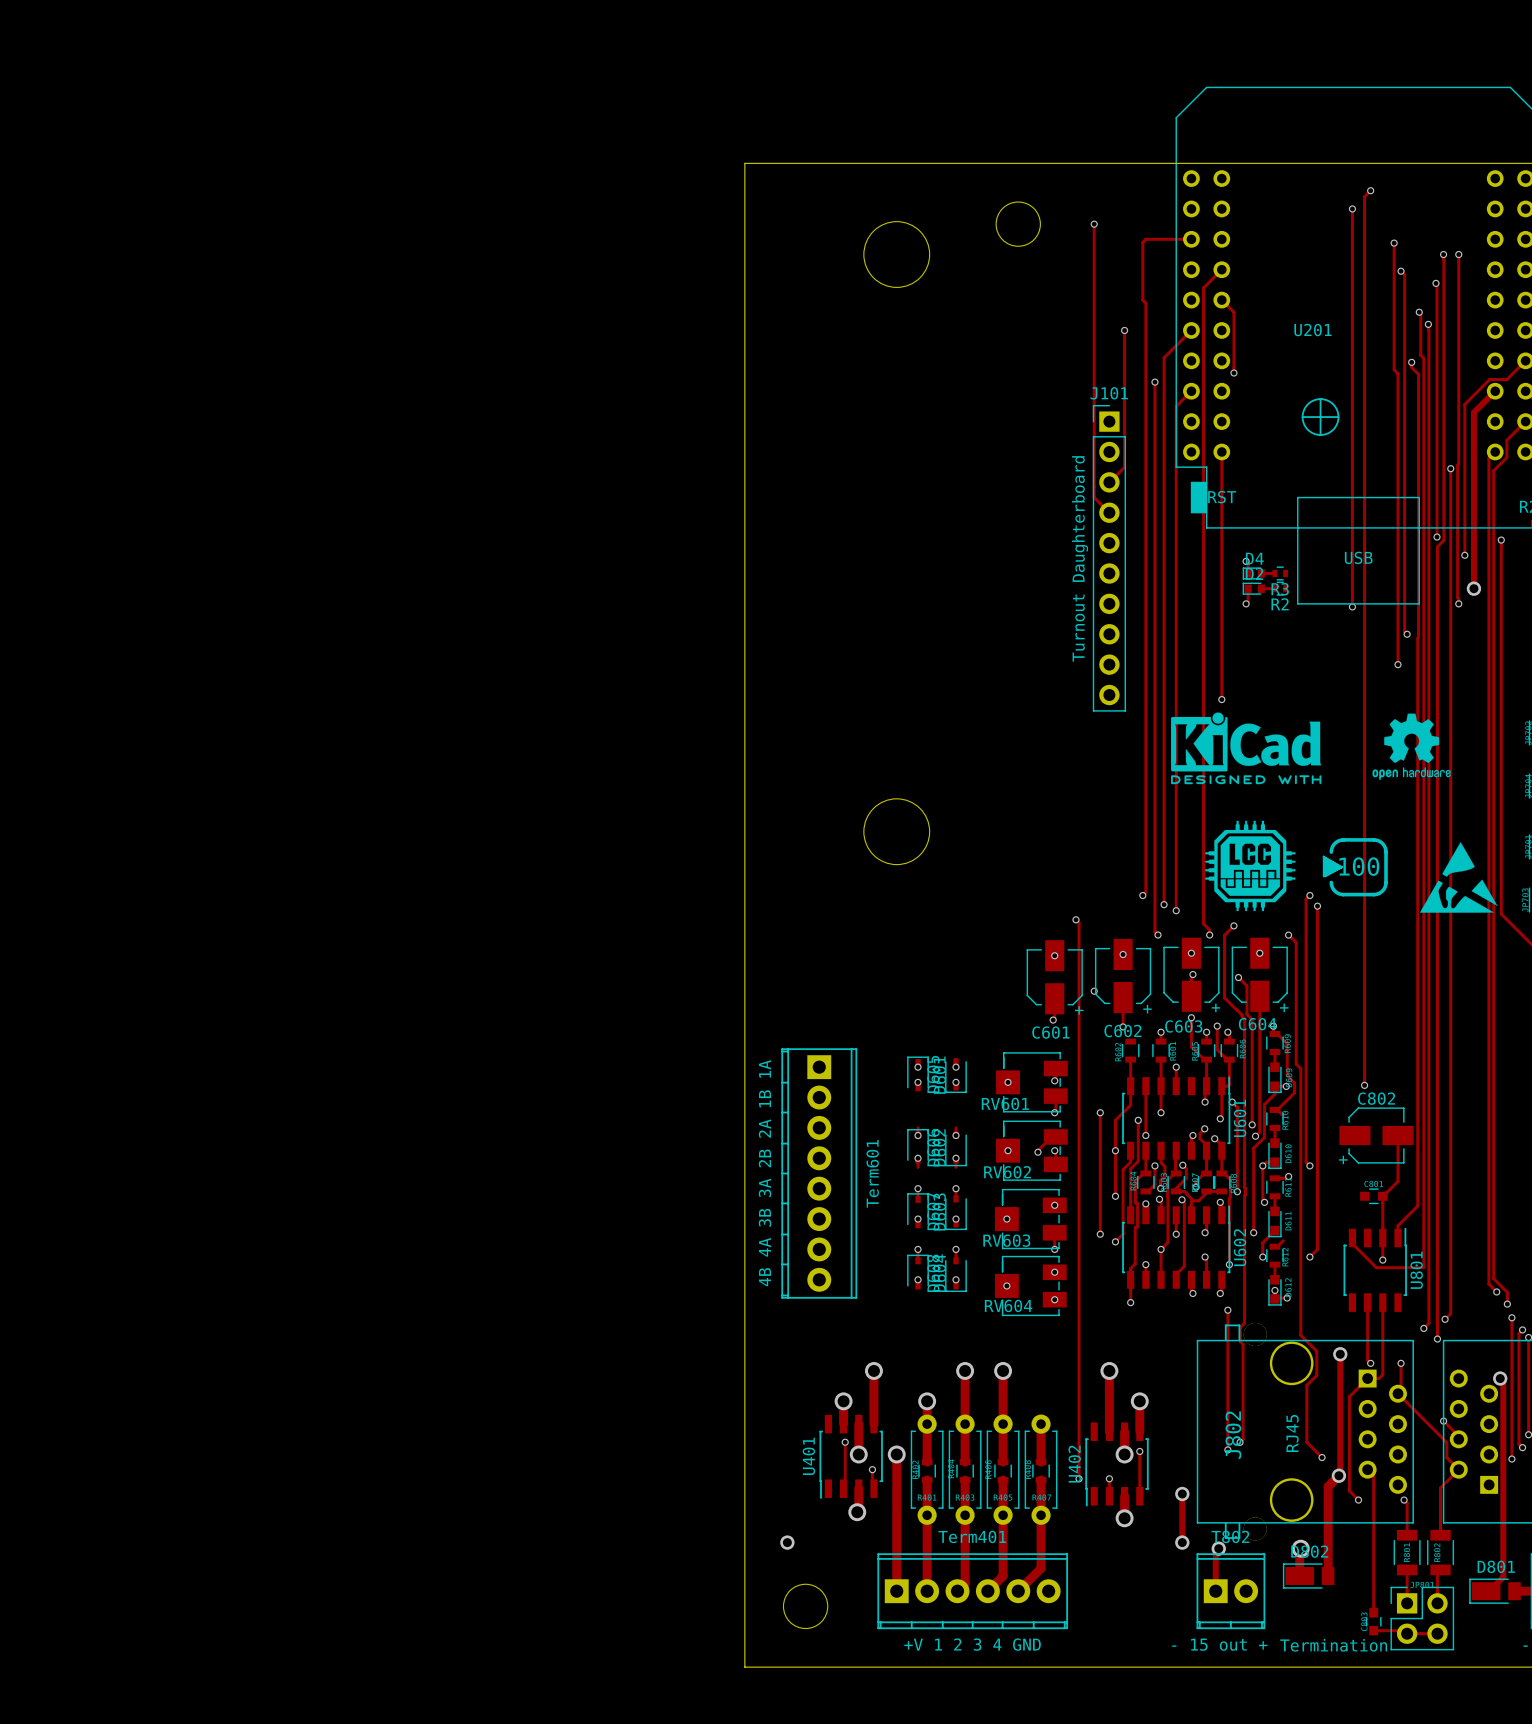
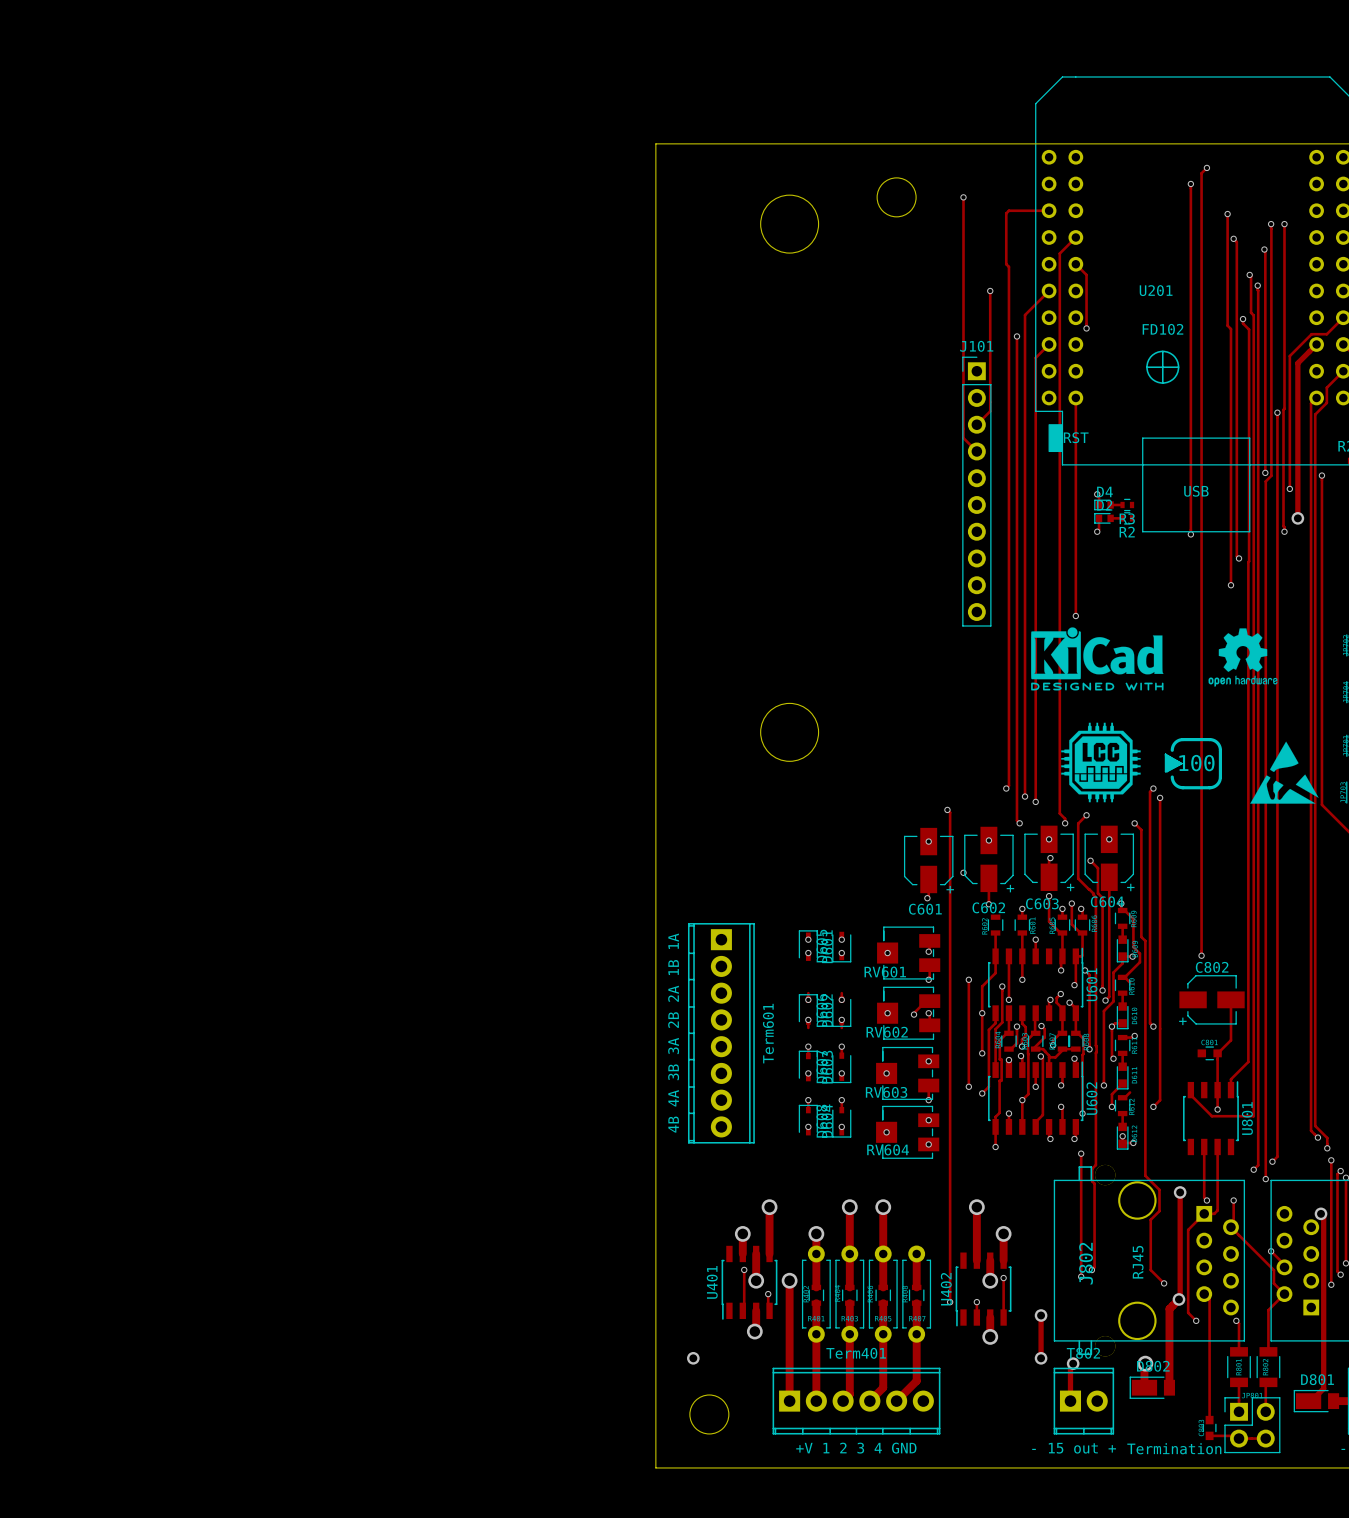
FD102: none -> (1162, 367)
J101 value: Turnout Daughterboard (1080, 558) -> none

